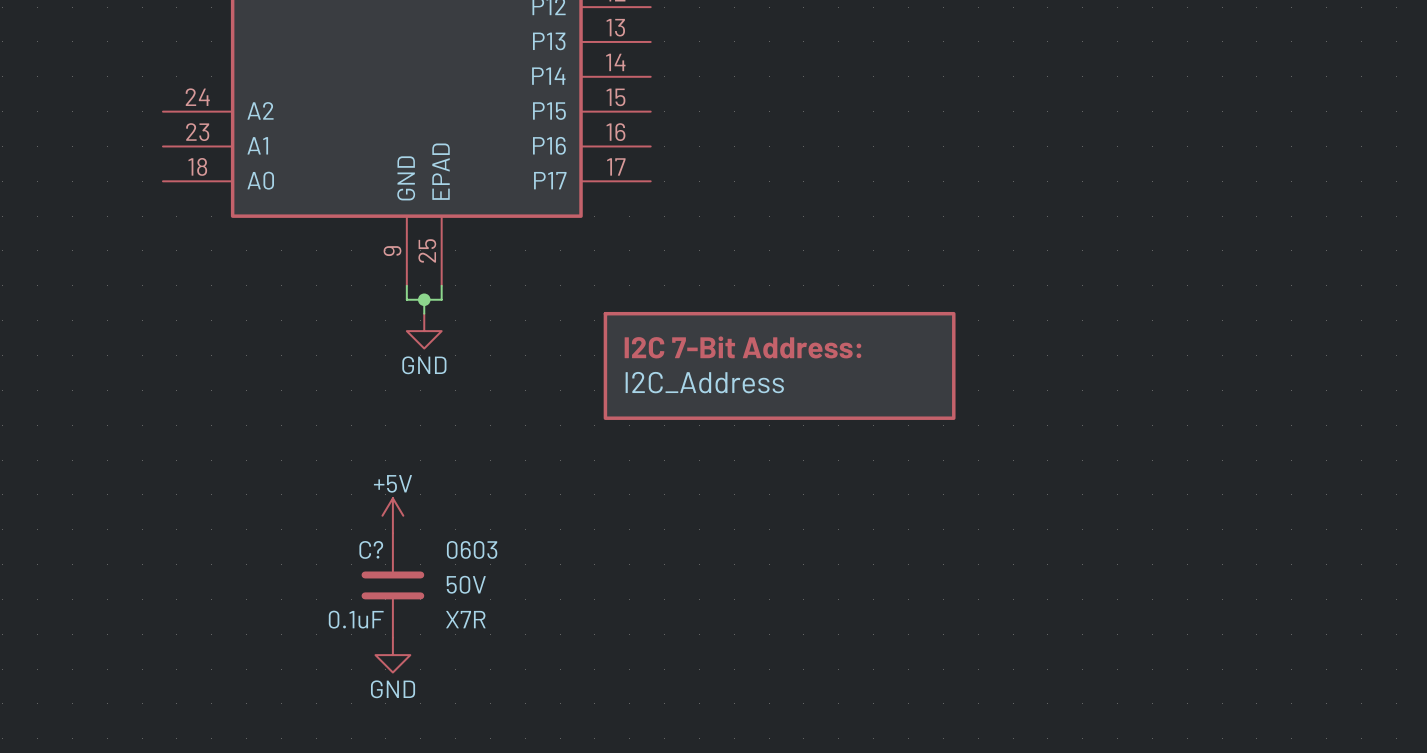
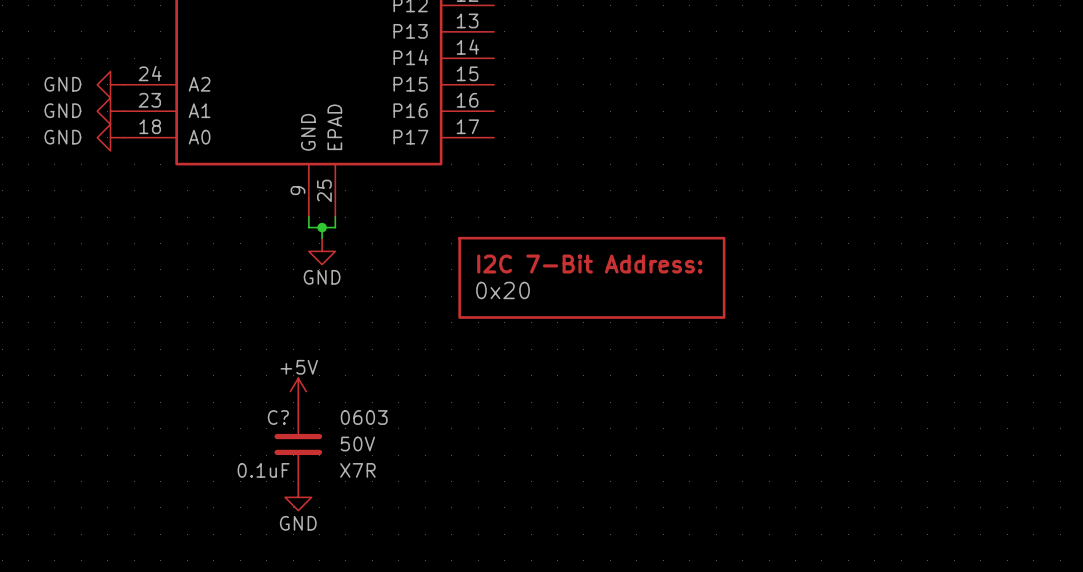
power symbol: none -> GND (110, 84)
power symbol: none -> GND (110, 111)
power symbol: none -> GND (110, 137)
part value: I2C_Address (704, 382) -> 0x20 (503, 290)

